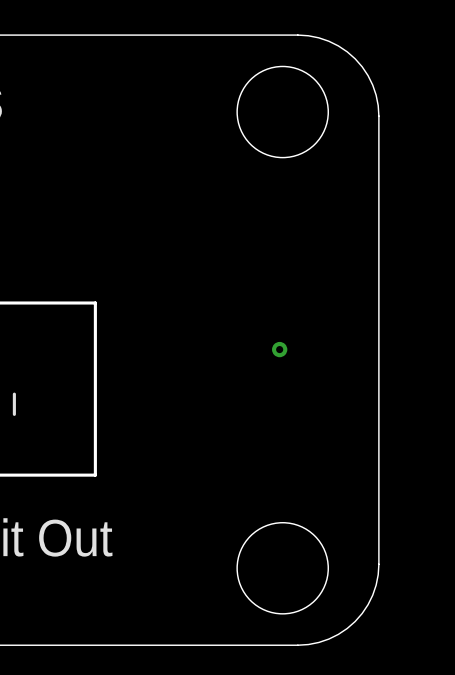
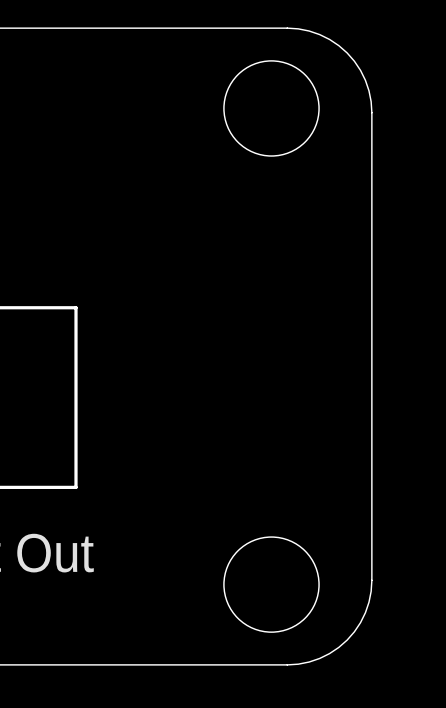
via: (279, 349) -> none

